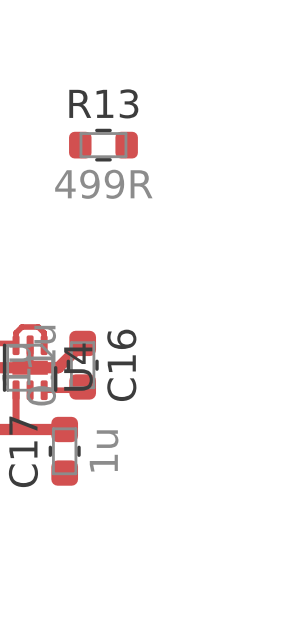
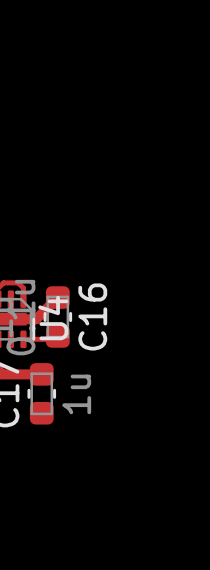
R13: 499R (103, 145) -> none

